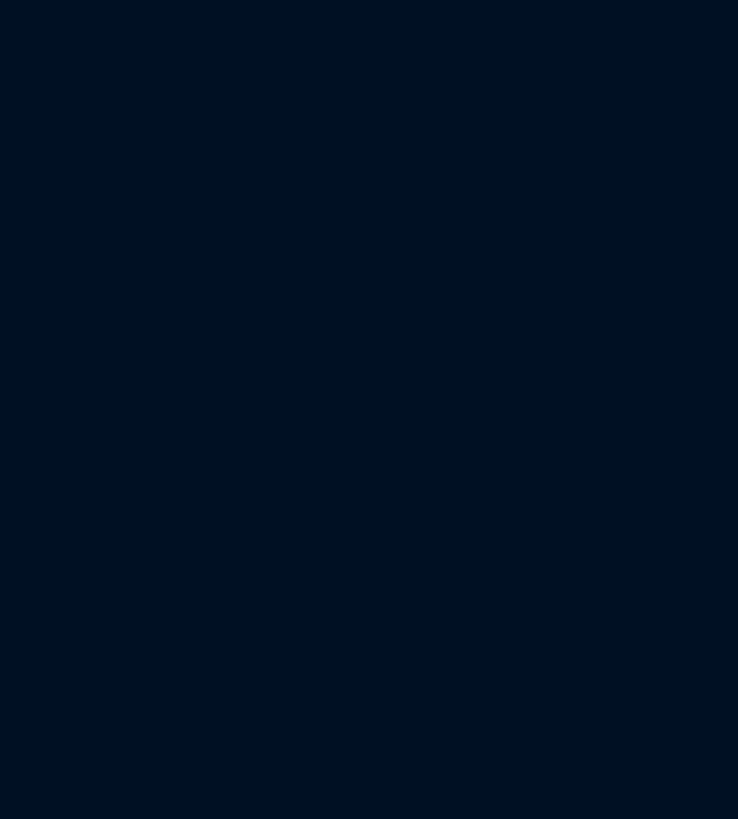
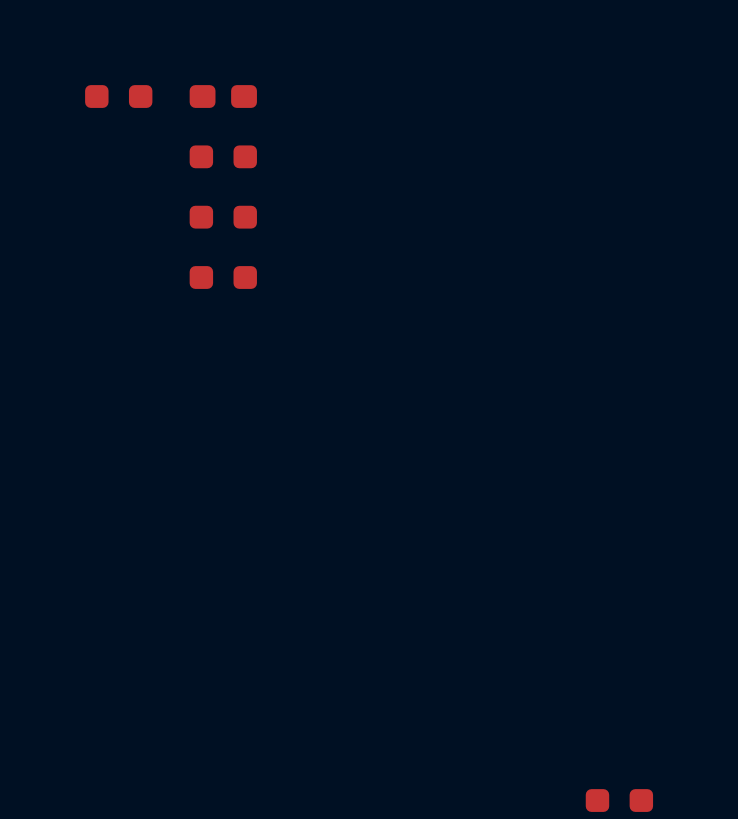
part: none -> (118, 96)
part: none -> (223, 96)
part: none -> (223, 156)
part: none -> (223, 217)
part: none -> (223, 277)
part: none -> (619, 800)

